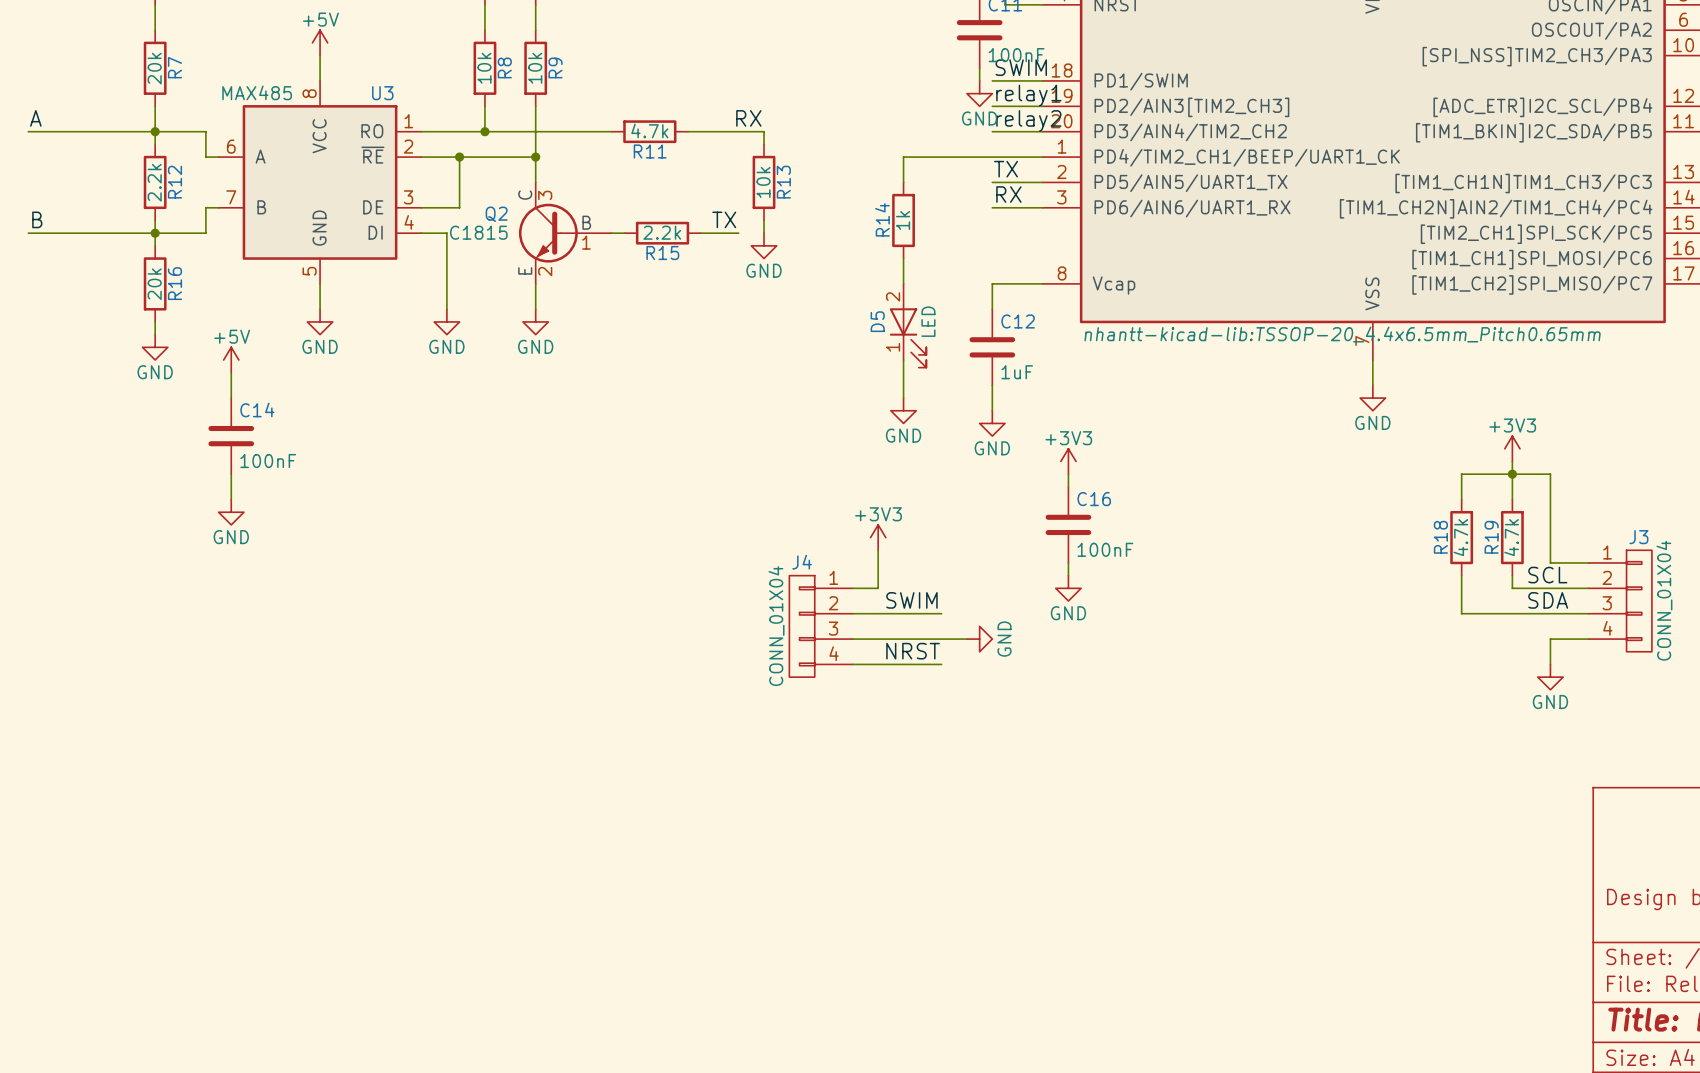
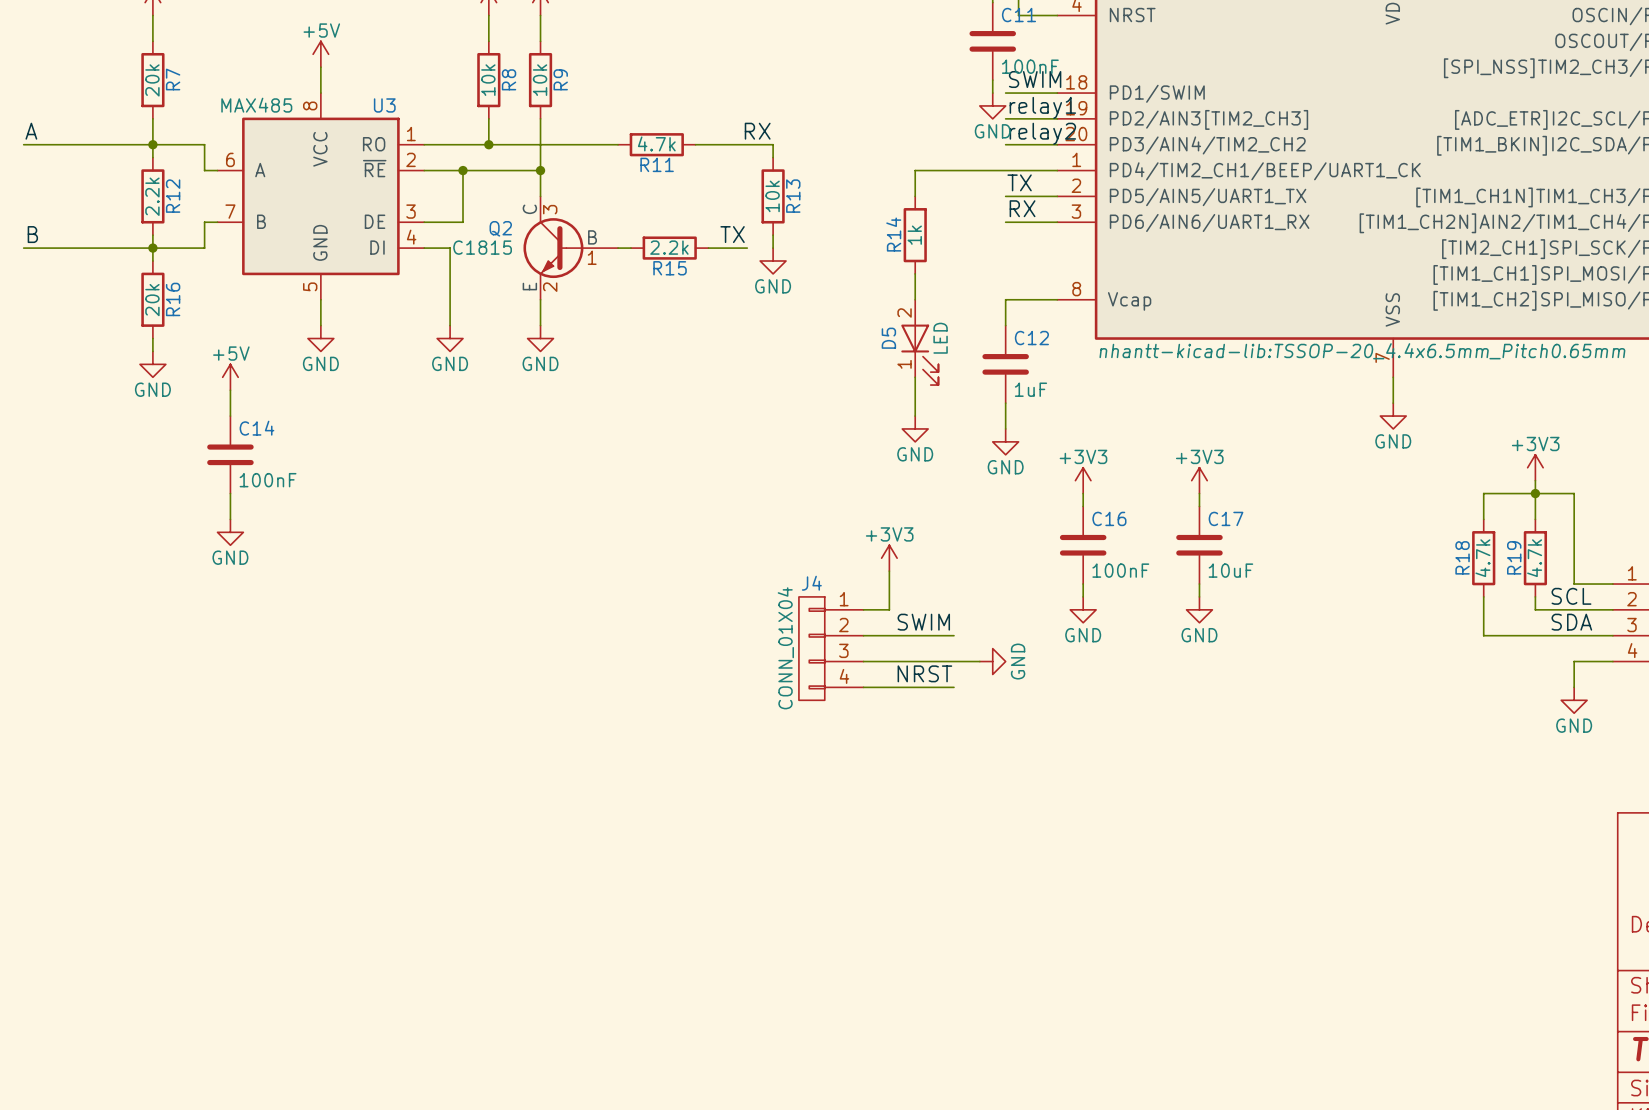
power symbol: none -> +3V3 (1199, 480)
wire: none -> (1199, 493) (1199, 506)
C17: none -> 10uF (1199, 545)
wire: none -> (1199, 584) (1199, 596)
power symbol: none -> GND (1199, 609)

